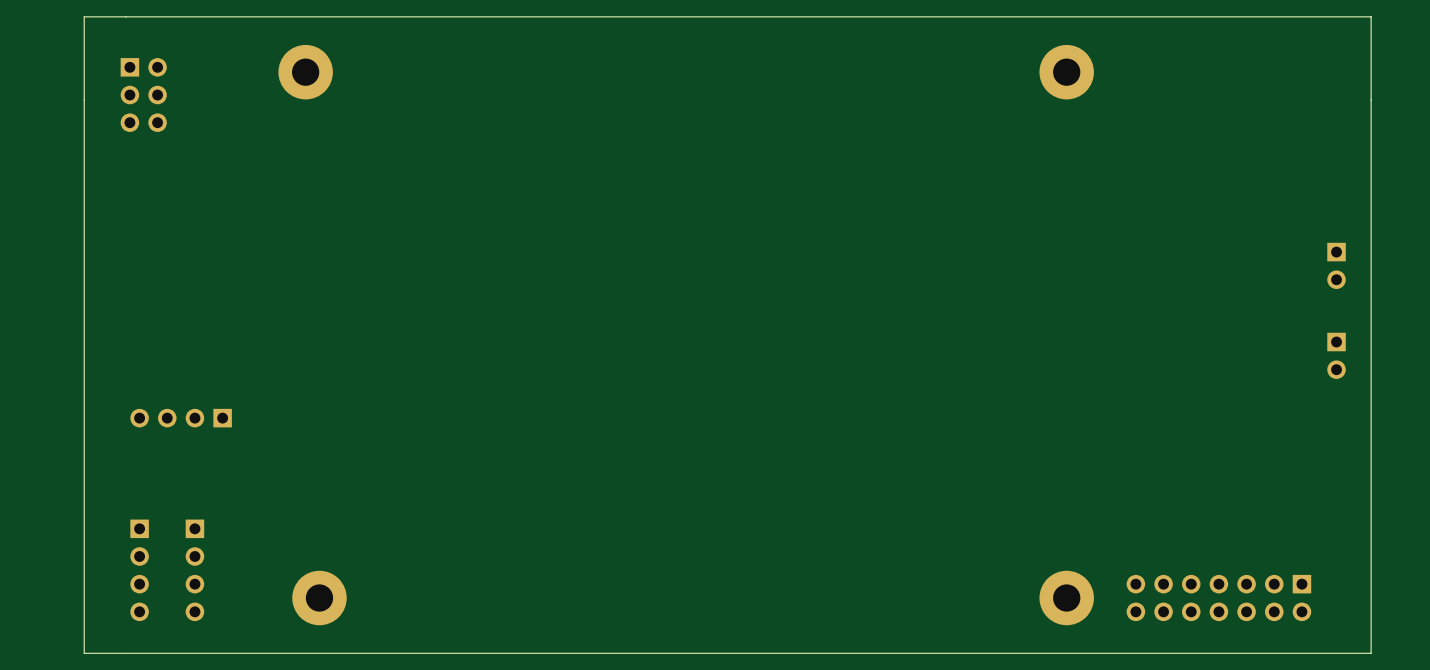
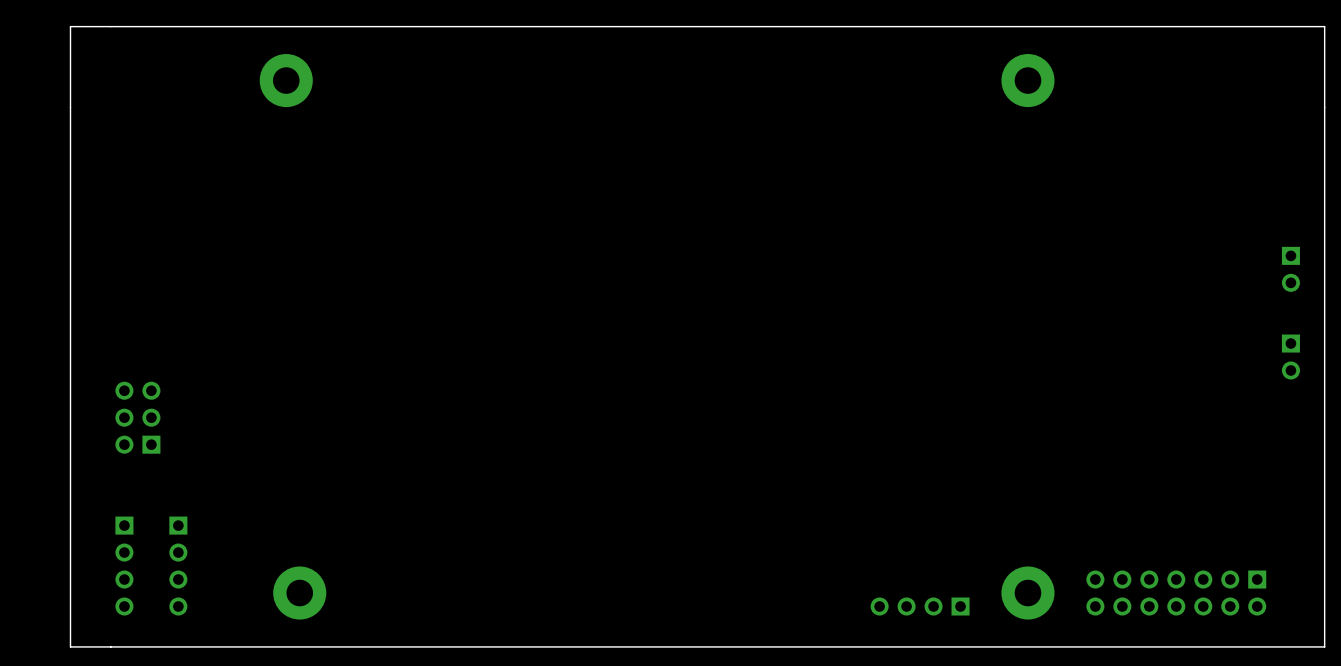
part: (143, 95) -> none
part: none -> (137, 417)
part: (181, 418) -> none
part: none -> (920, 606)

